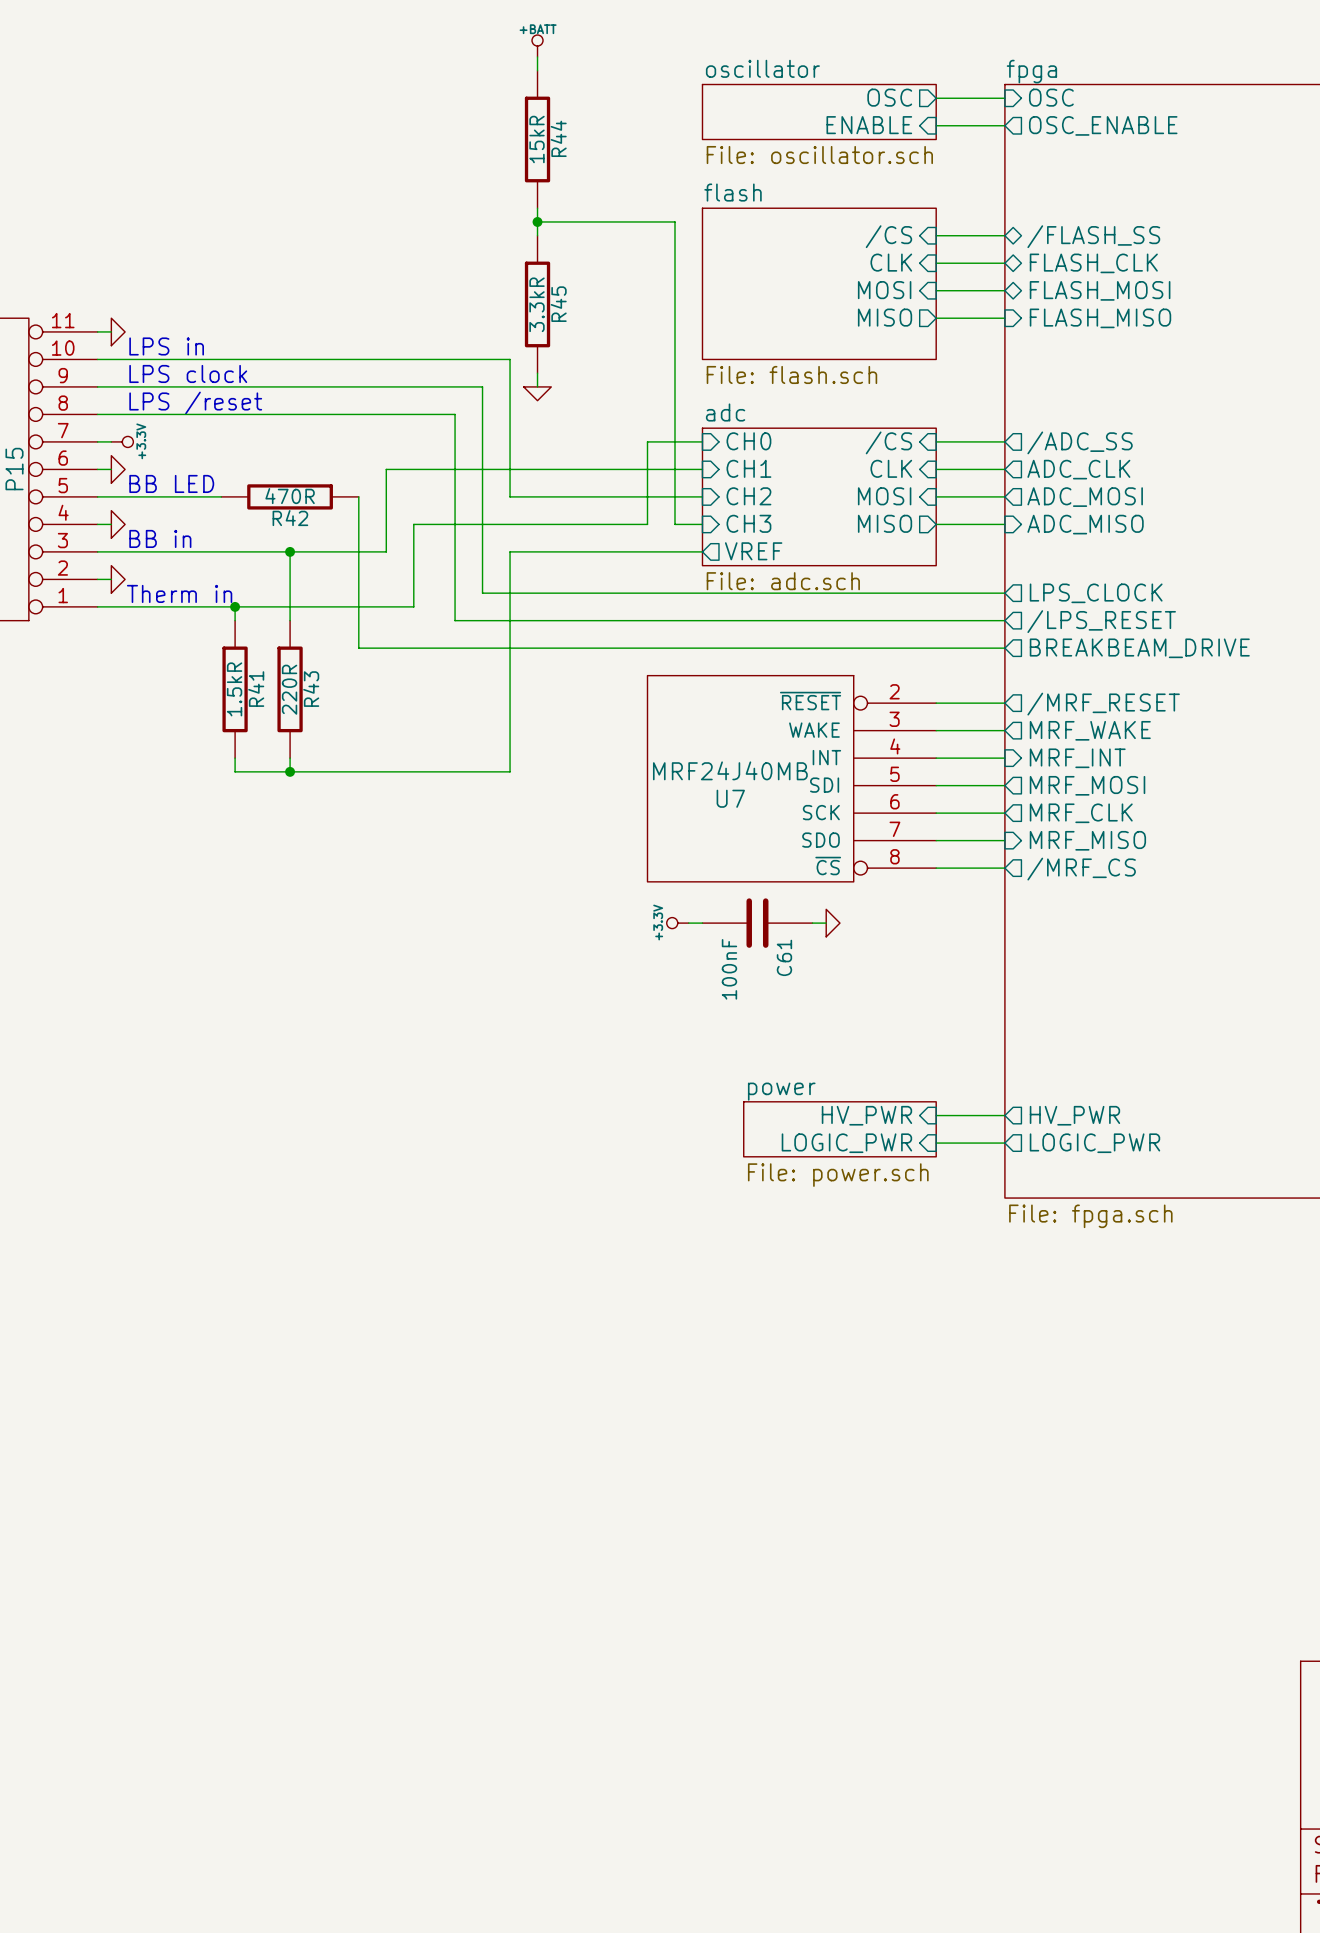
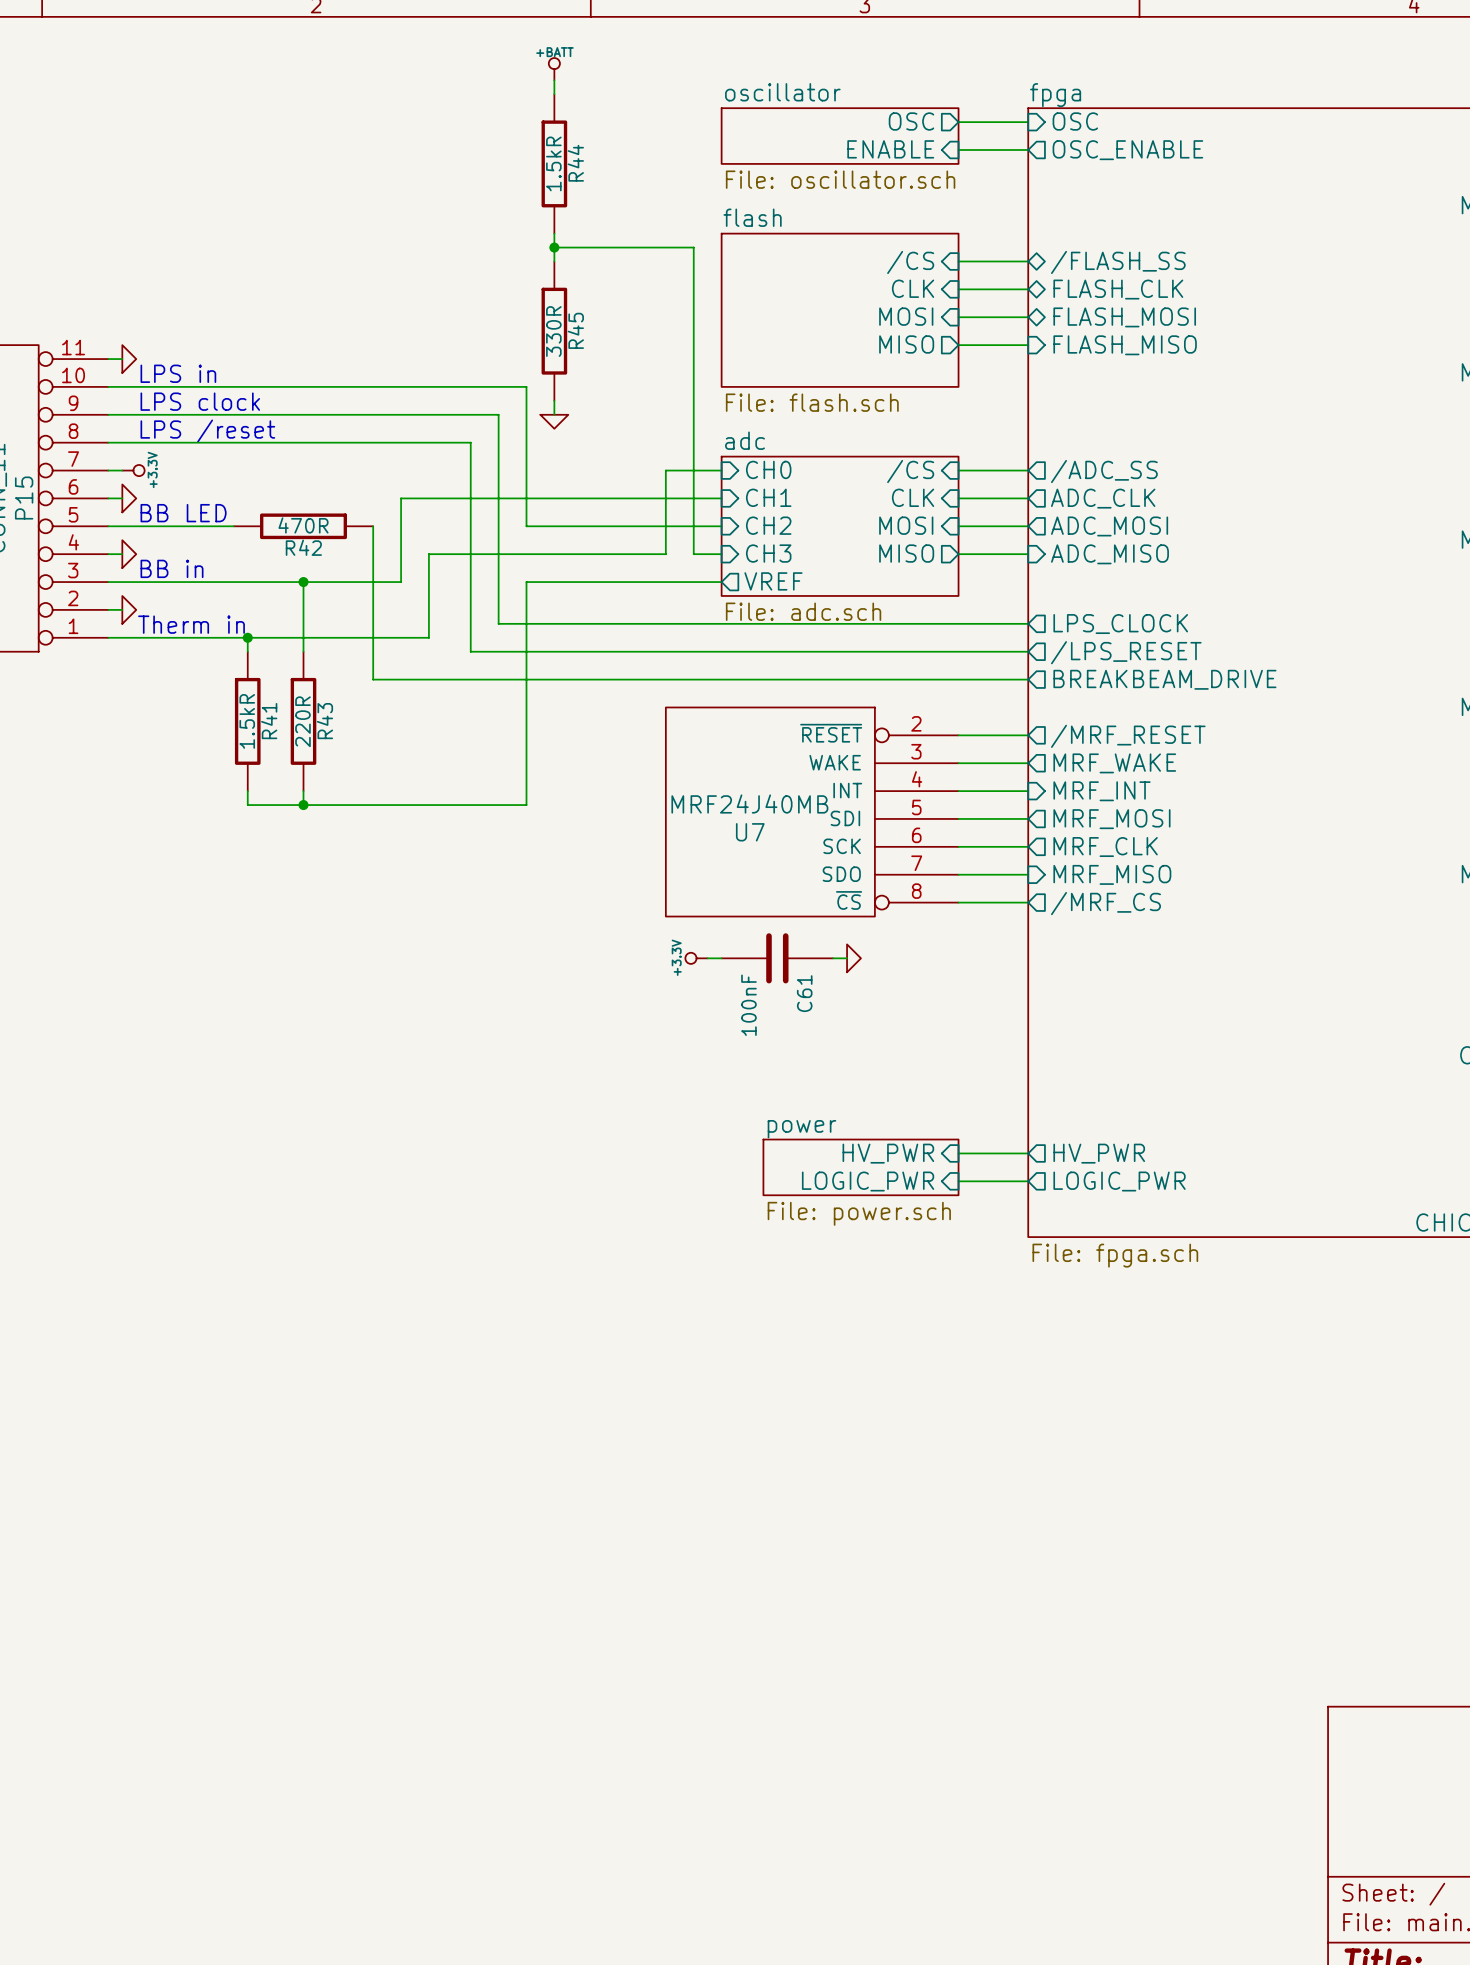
R44 value: 15kR (537, 139) -> 1.5kR (553, 163)
R45 value: 3.3kR (537, 304) -> 330R (553, 331)

